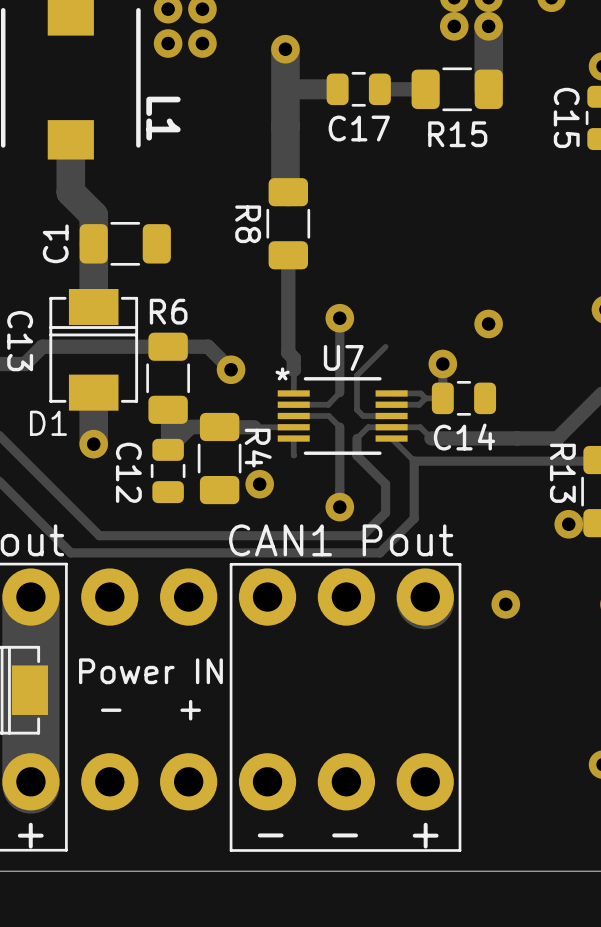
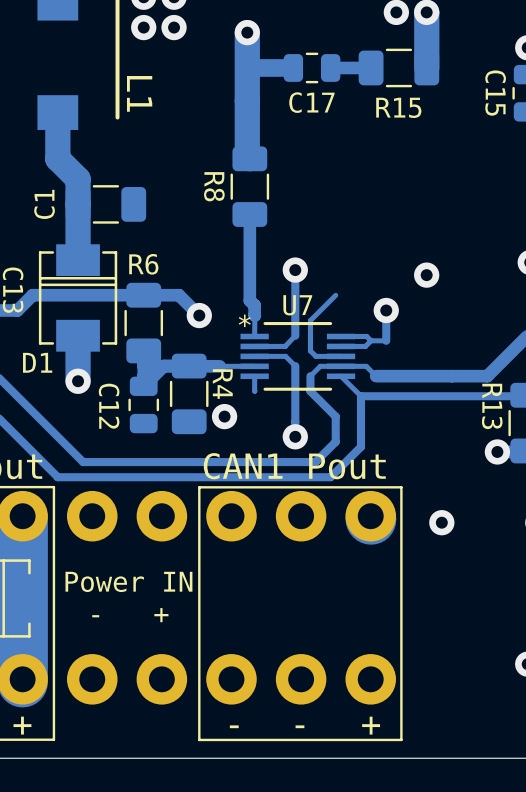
C14: (463, 398) -> none

